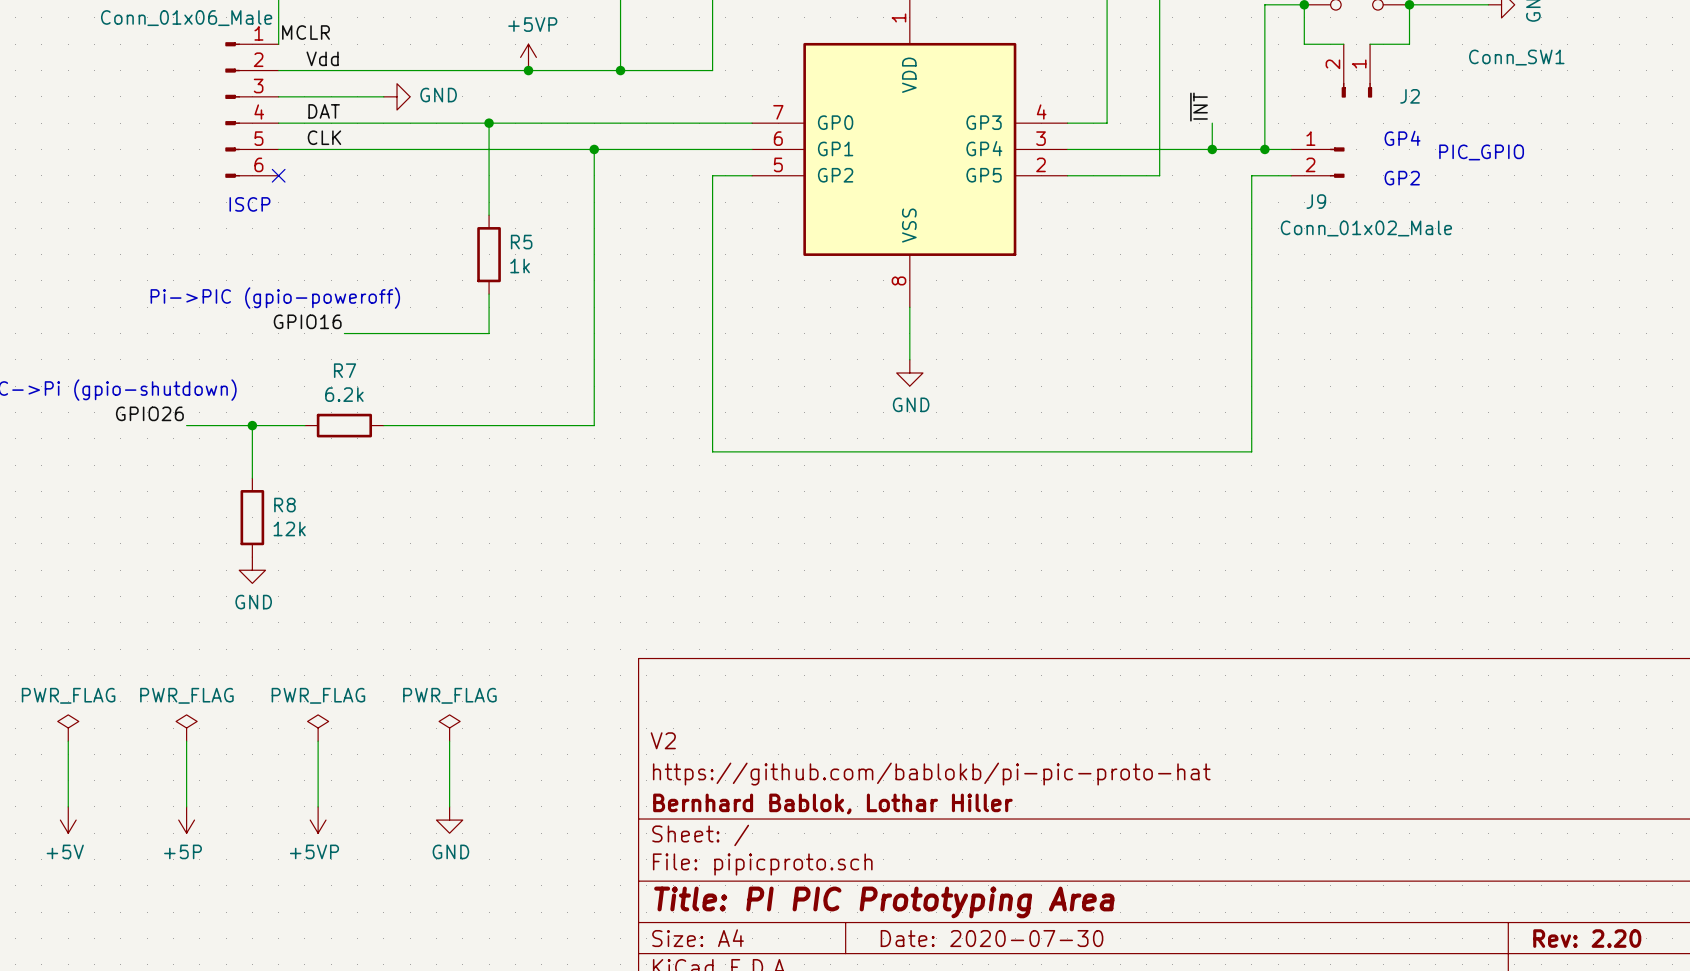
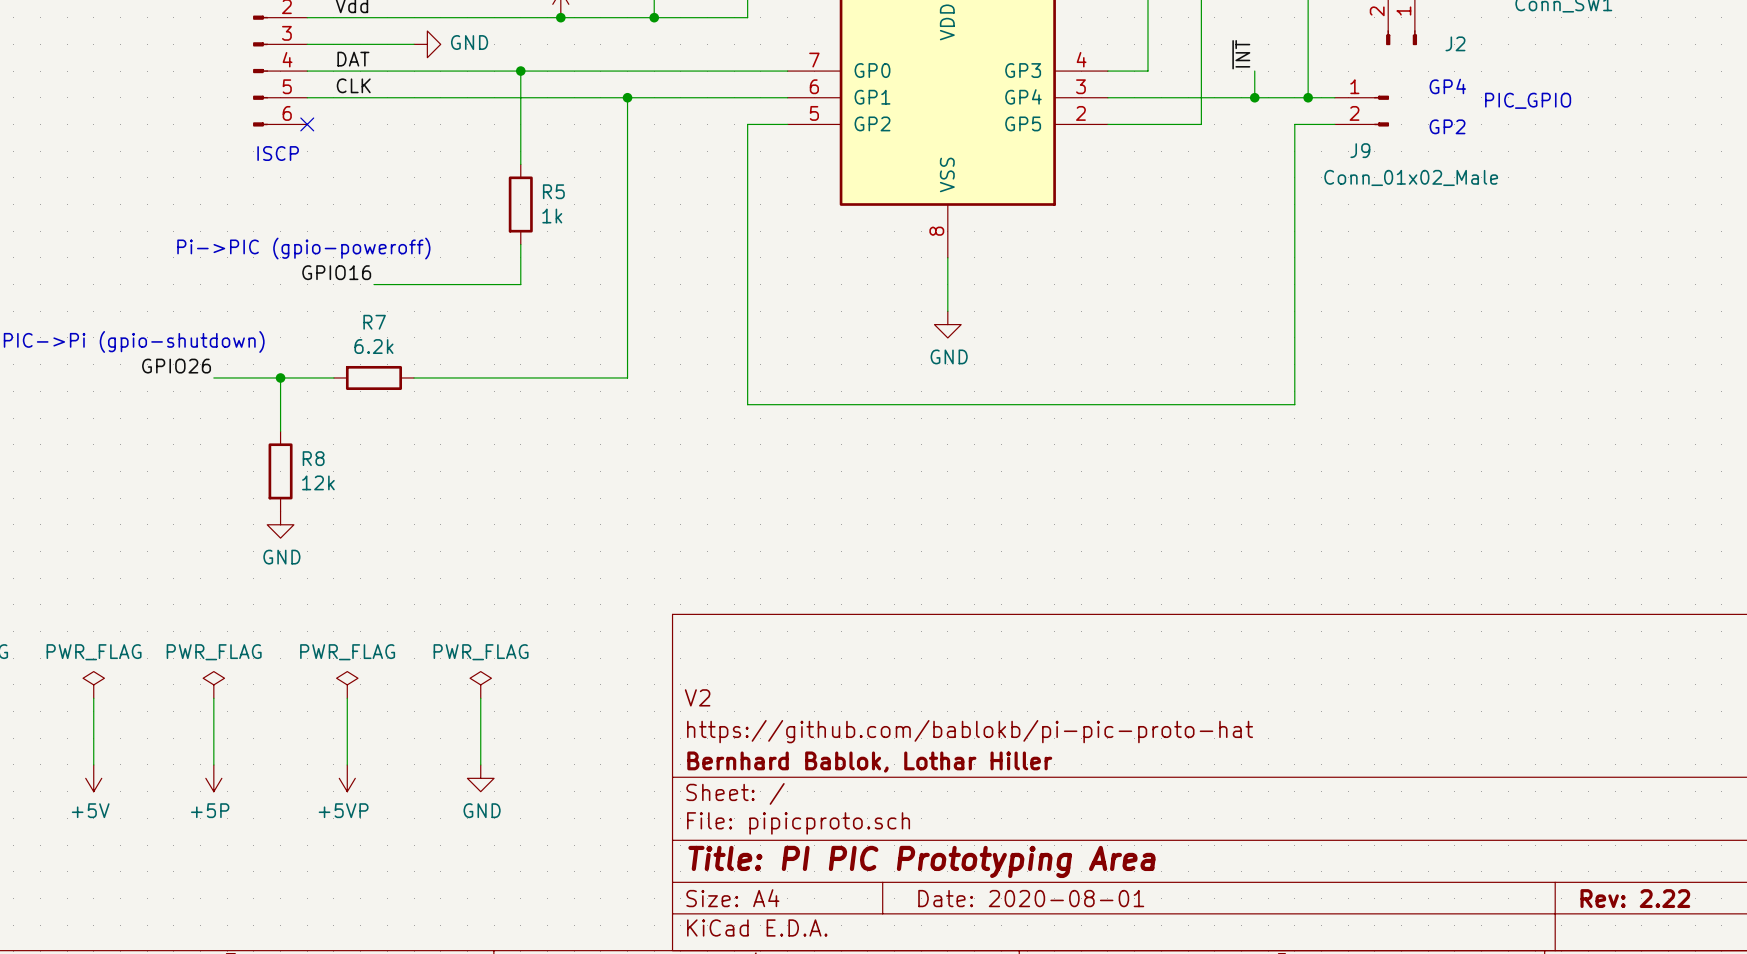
title block: Date: 2020-07-30 (992, 938) -> Date: 2020-08-01 (1031, 898)
title block: Rev: 2.20 (1587, 938) -> Rev: 2.22 (1635, 898)

